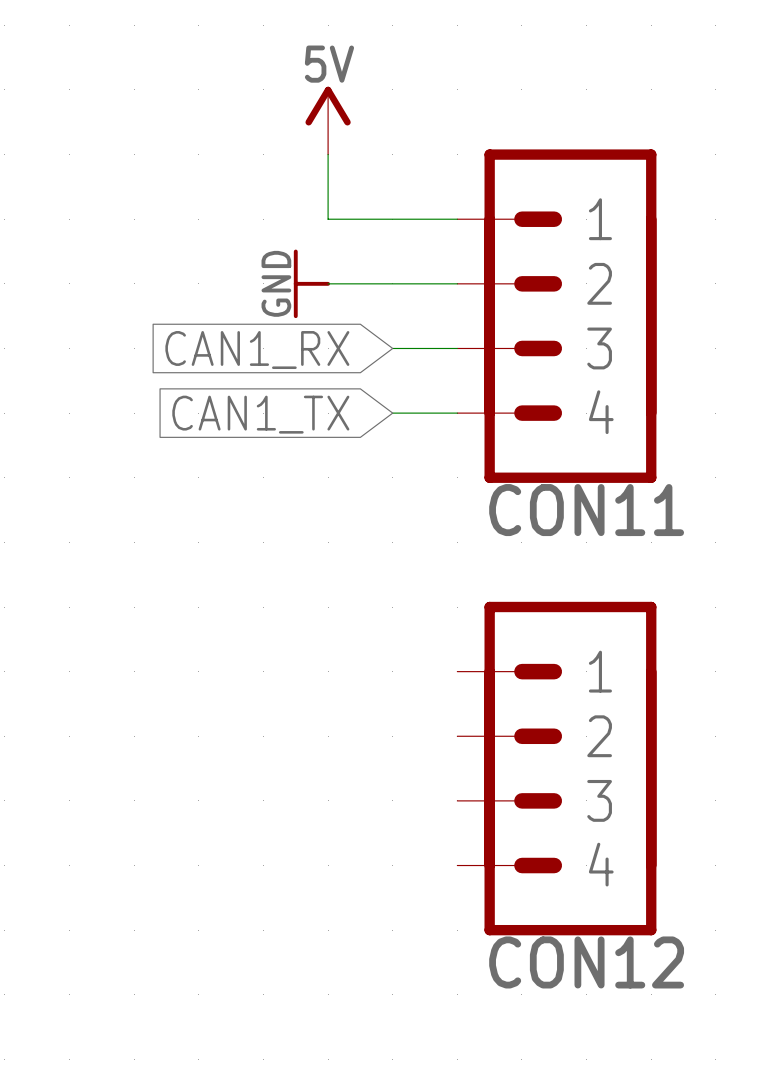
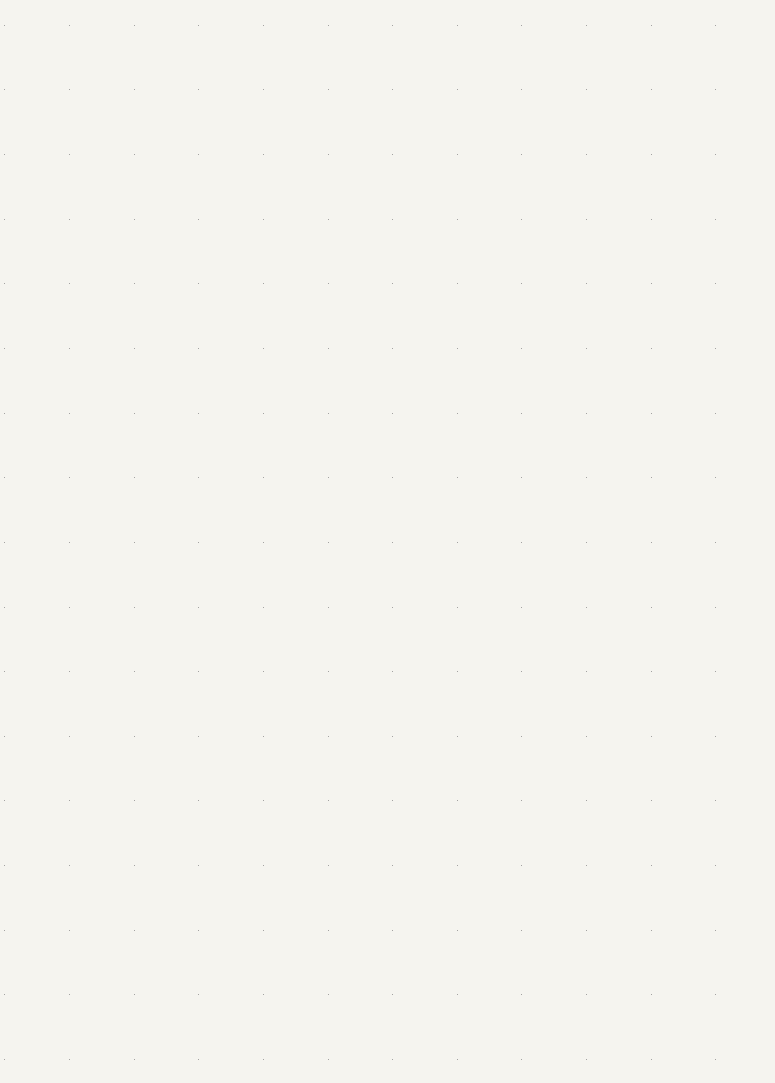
power symbol: 5V (328, 120) -> none
wire: (328, 154) (328, 219) (457, 219) -> none
power symbol: GND (311, 283) -> none
wire: (328, 283) (457, 283) -> none
CON11: (556, 316) -> none
wire: (392, 348) (457, 348) -> none
global label: CAN1_RX (257, 350) -> none
wire: (392, 413) (457, 413) -> none
global label: CAN1_TX (260, 414) -> none
CON12: (556, 768) -> none

